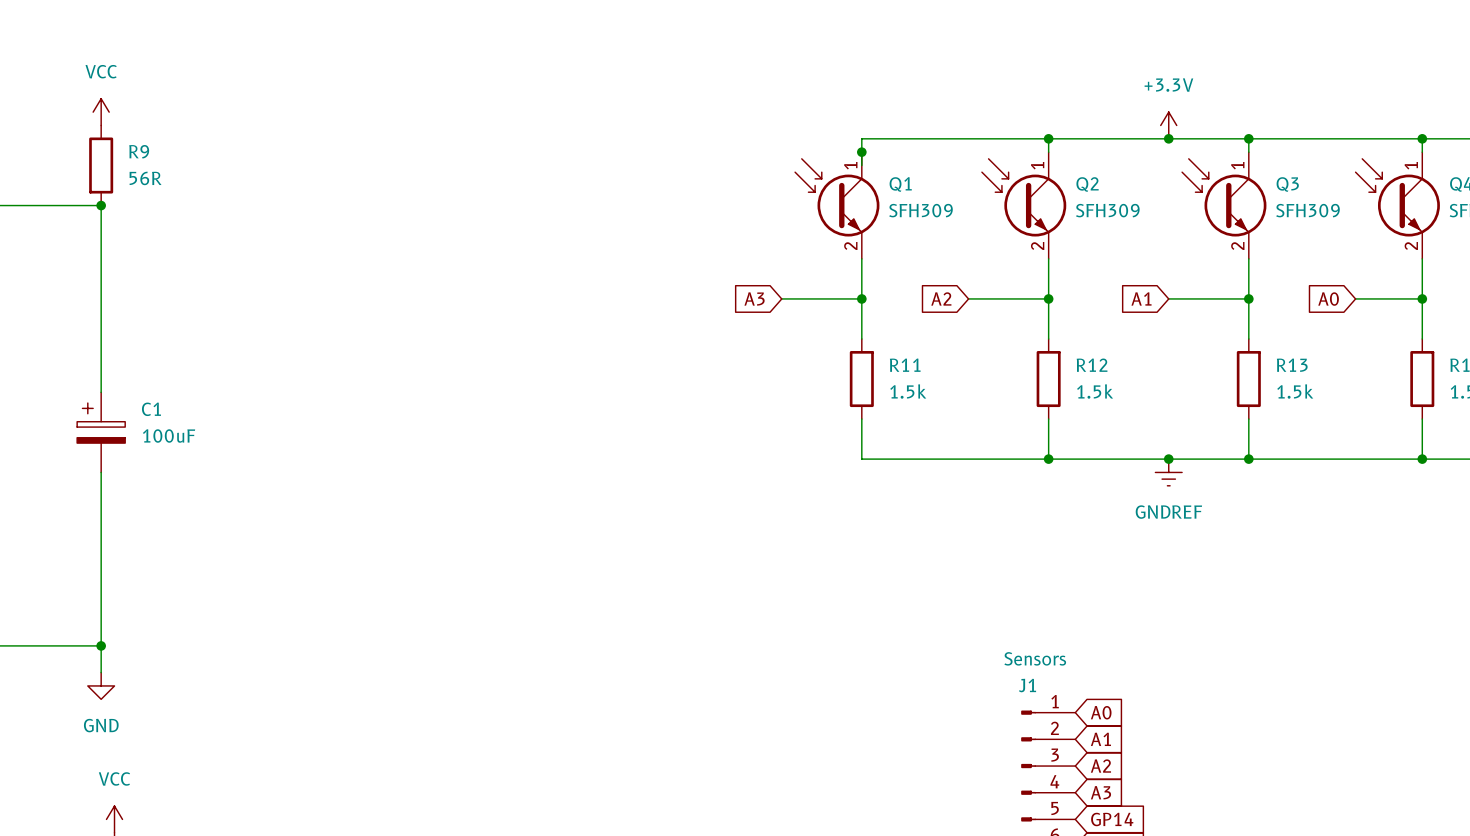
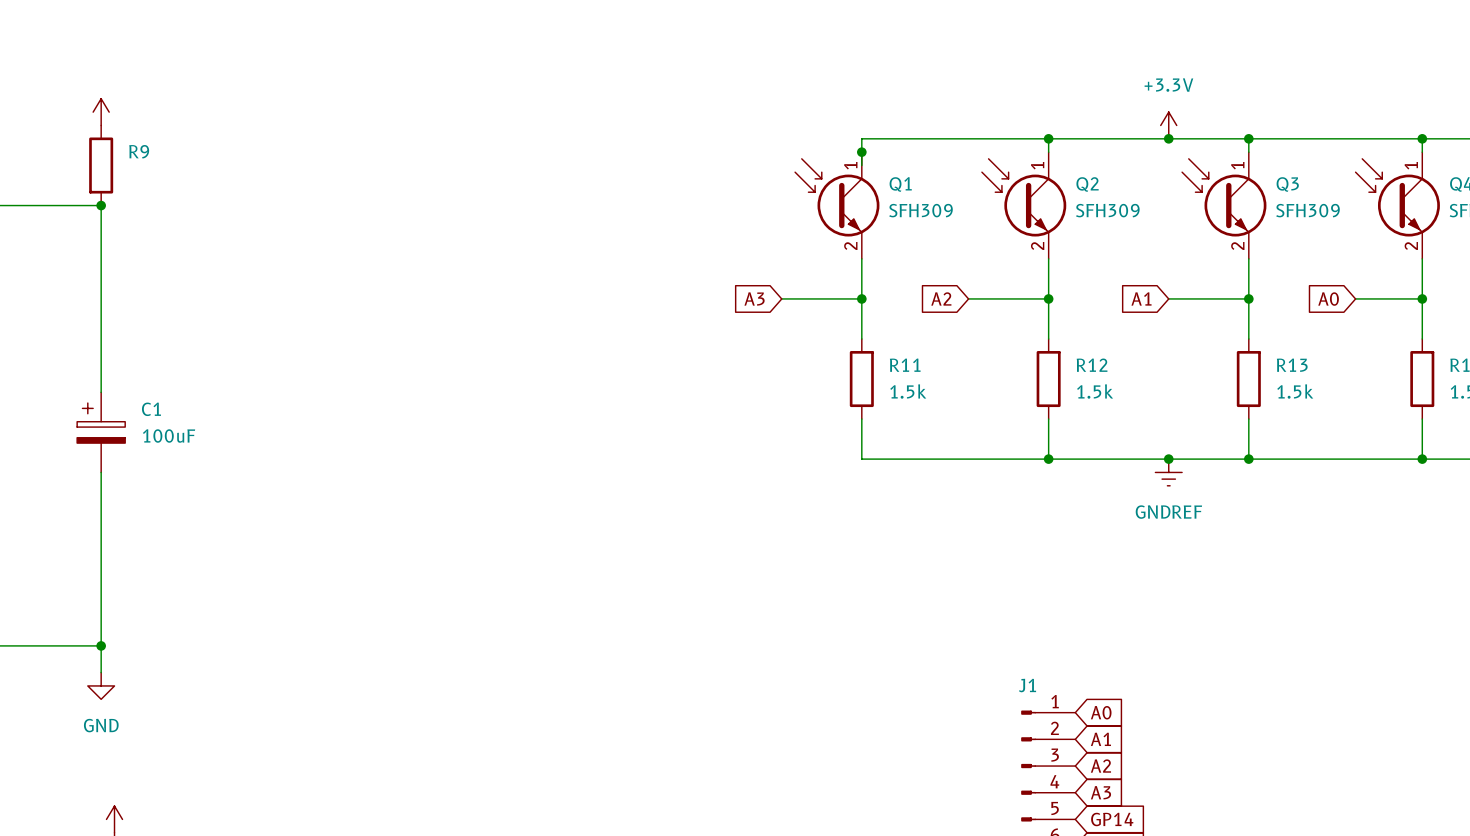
power symbol text: VCC (101, 71) -> none
R9 value: 56R (145, 178) -> none
J1 value: Sensors (1035, 658) -> none
power symbol text: VCC (114, 778) -> none

